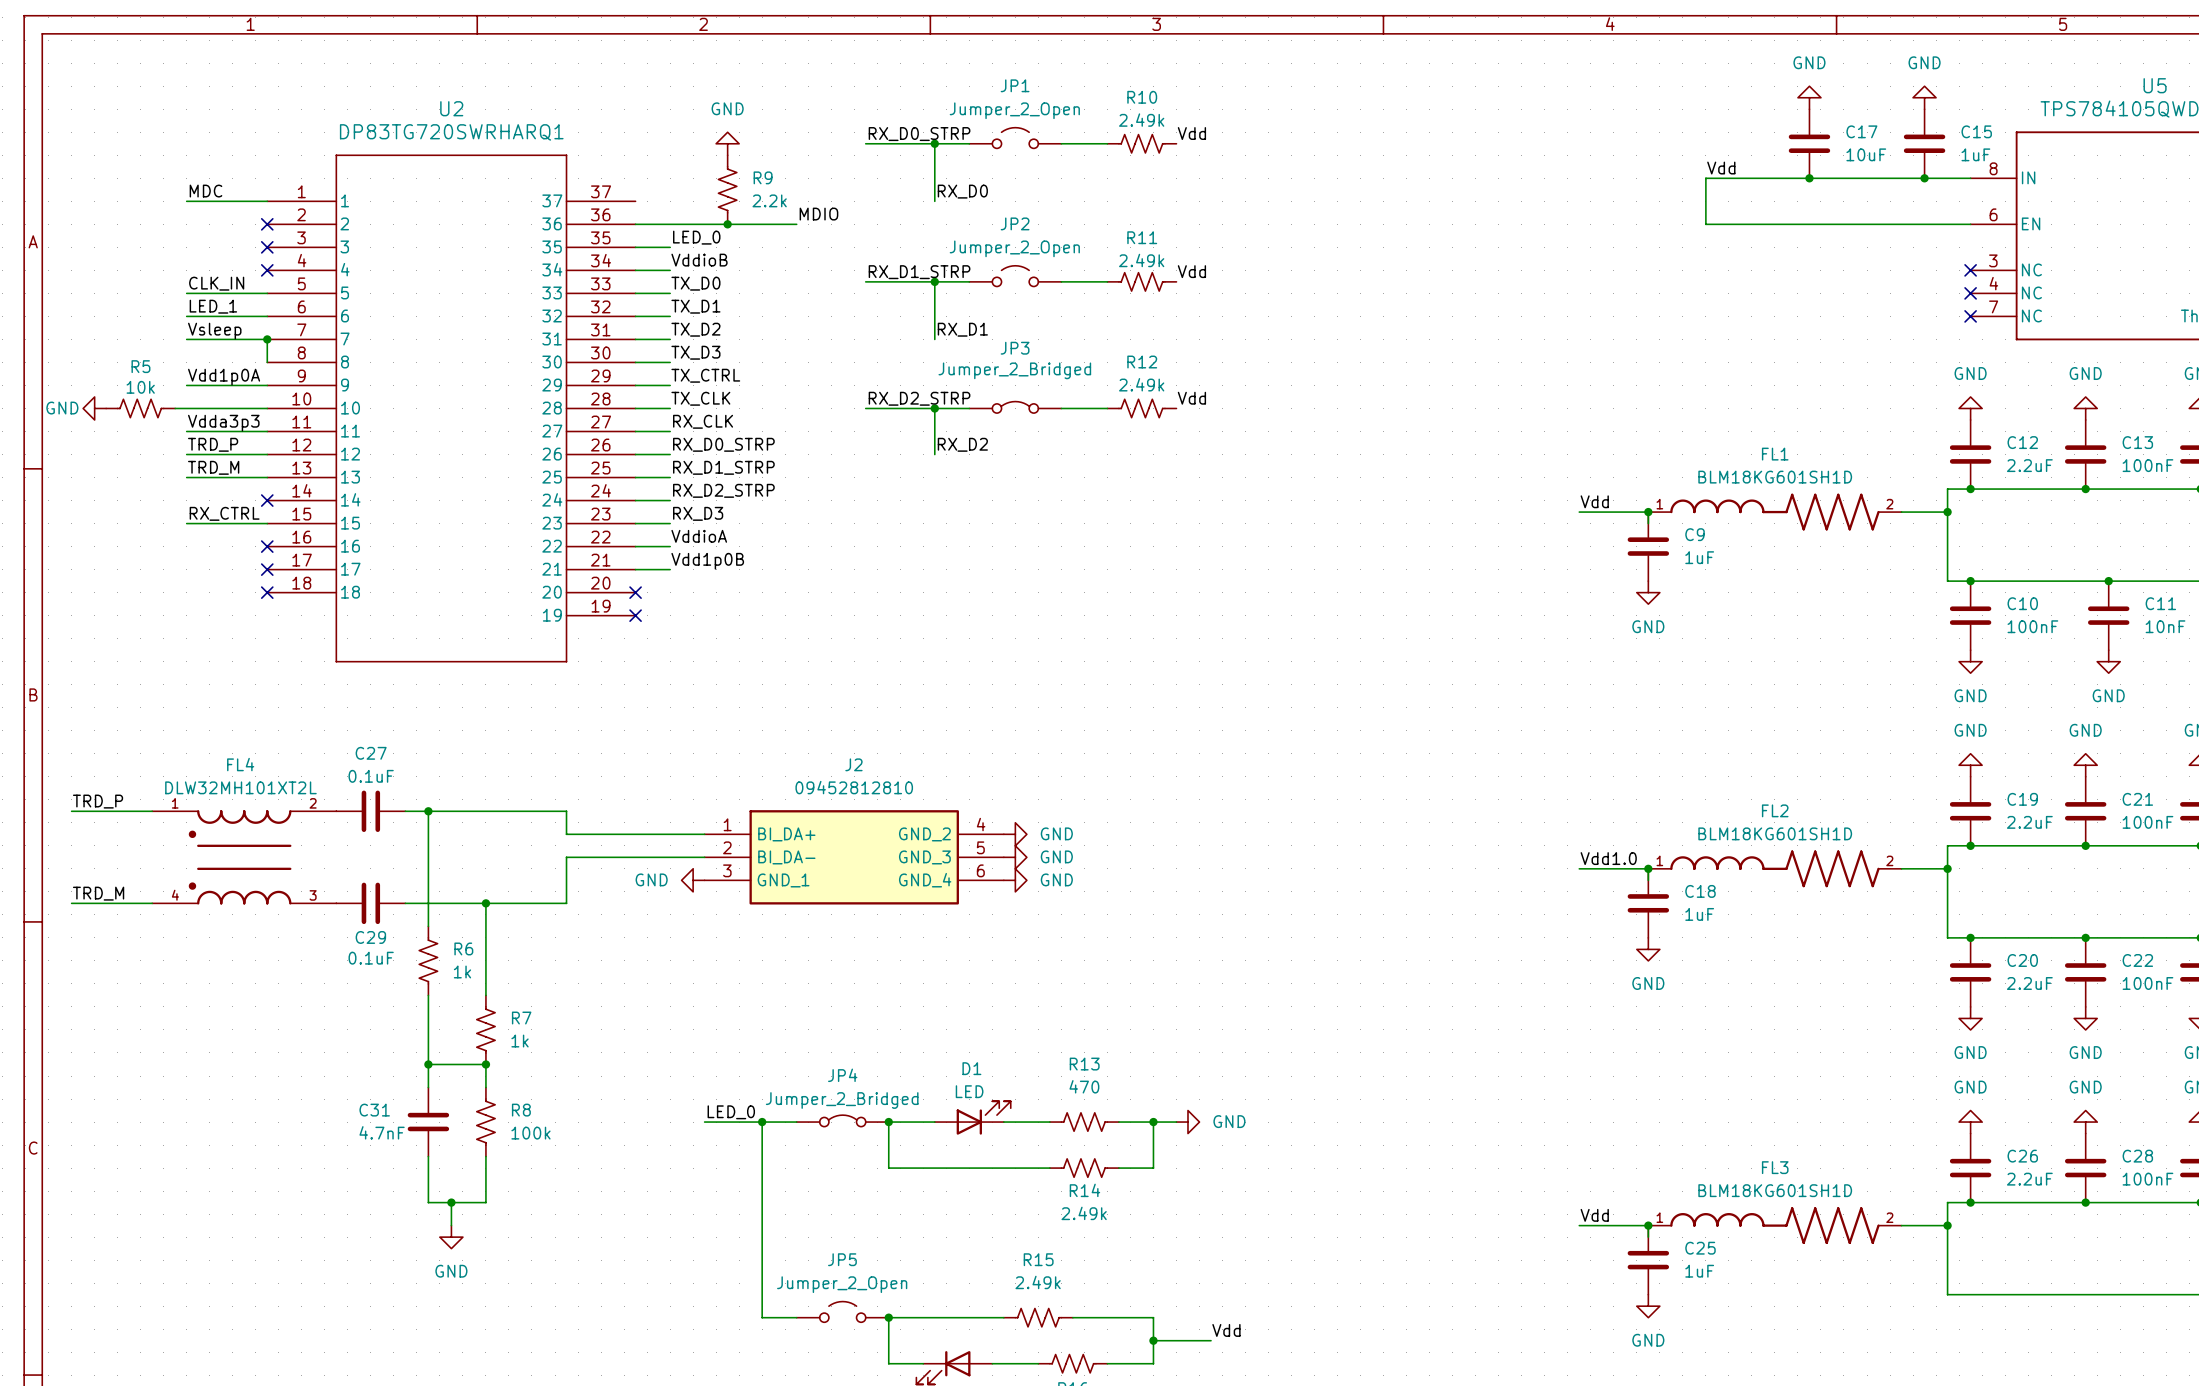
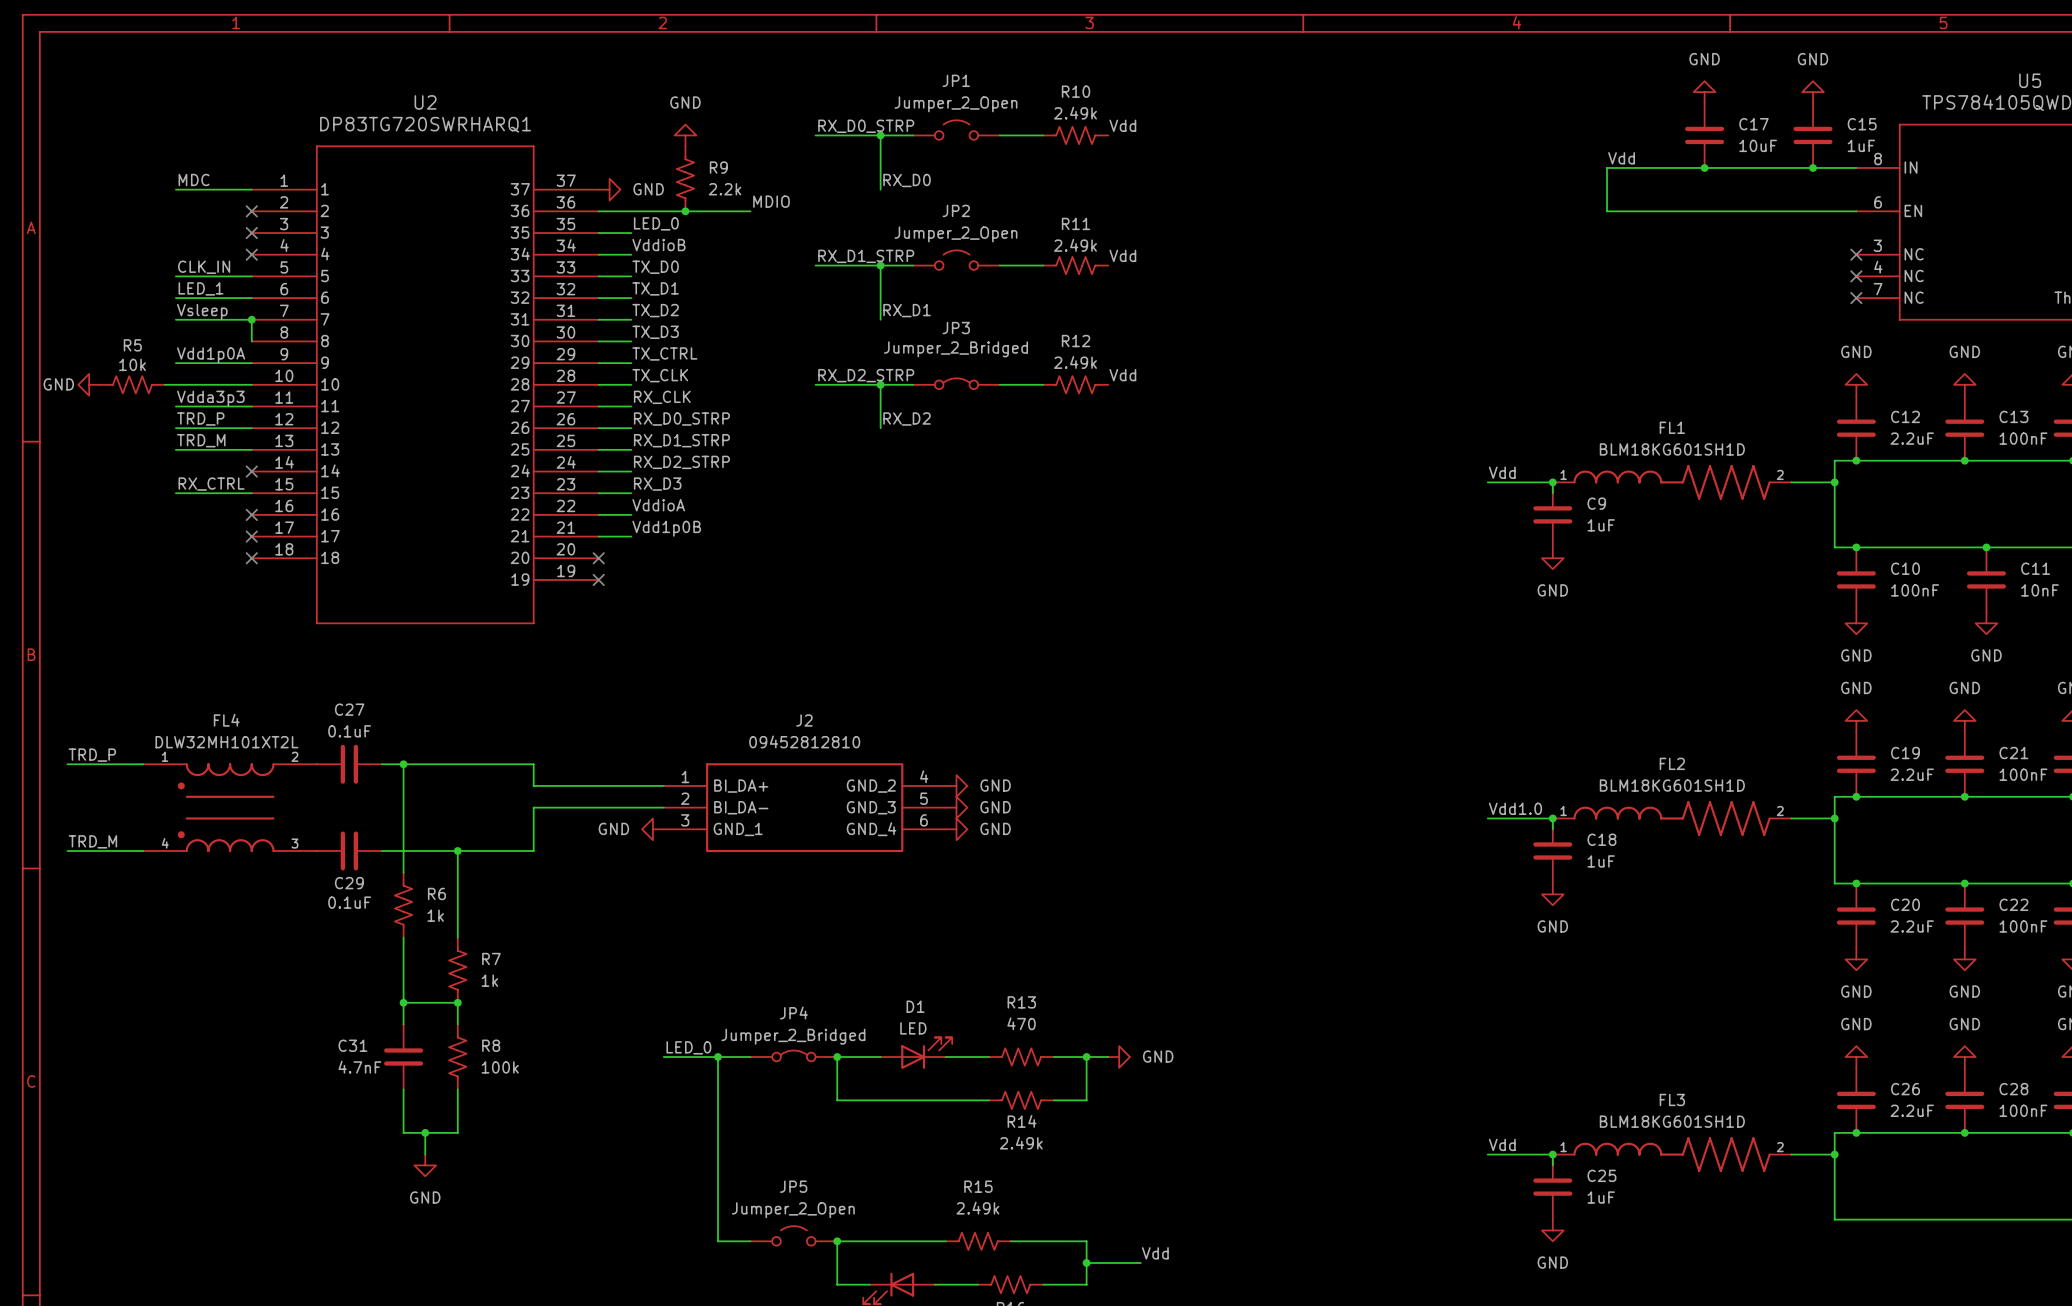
power symbol: none -> GND (609, 189)

